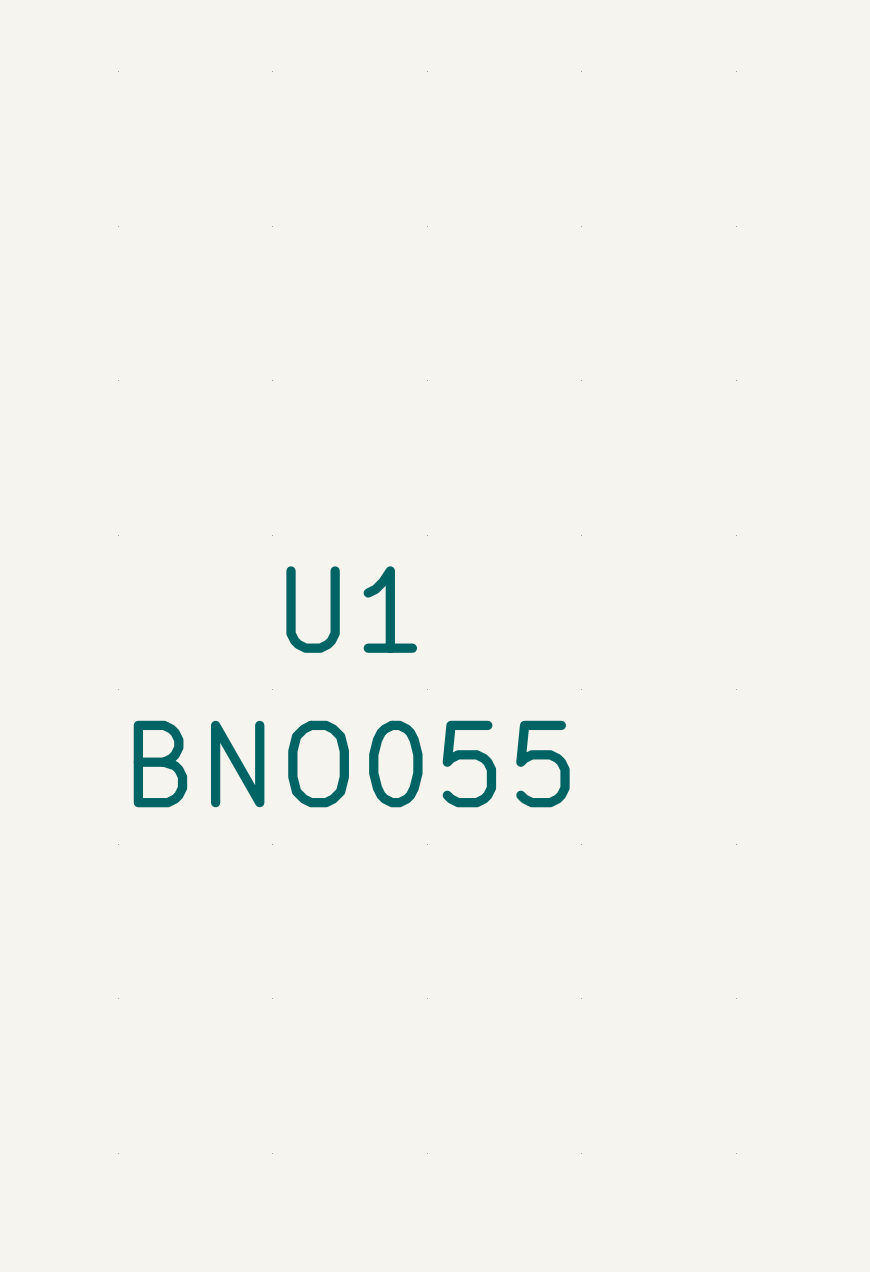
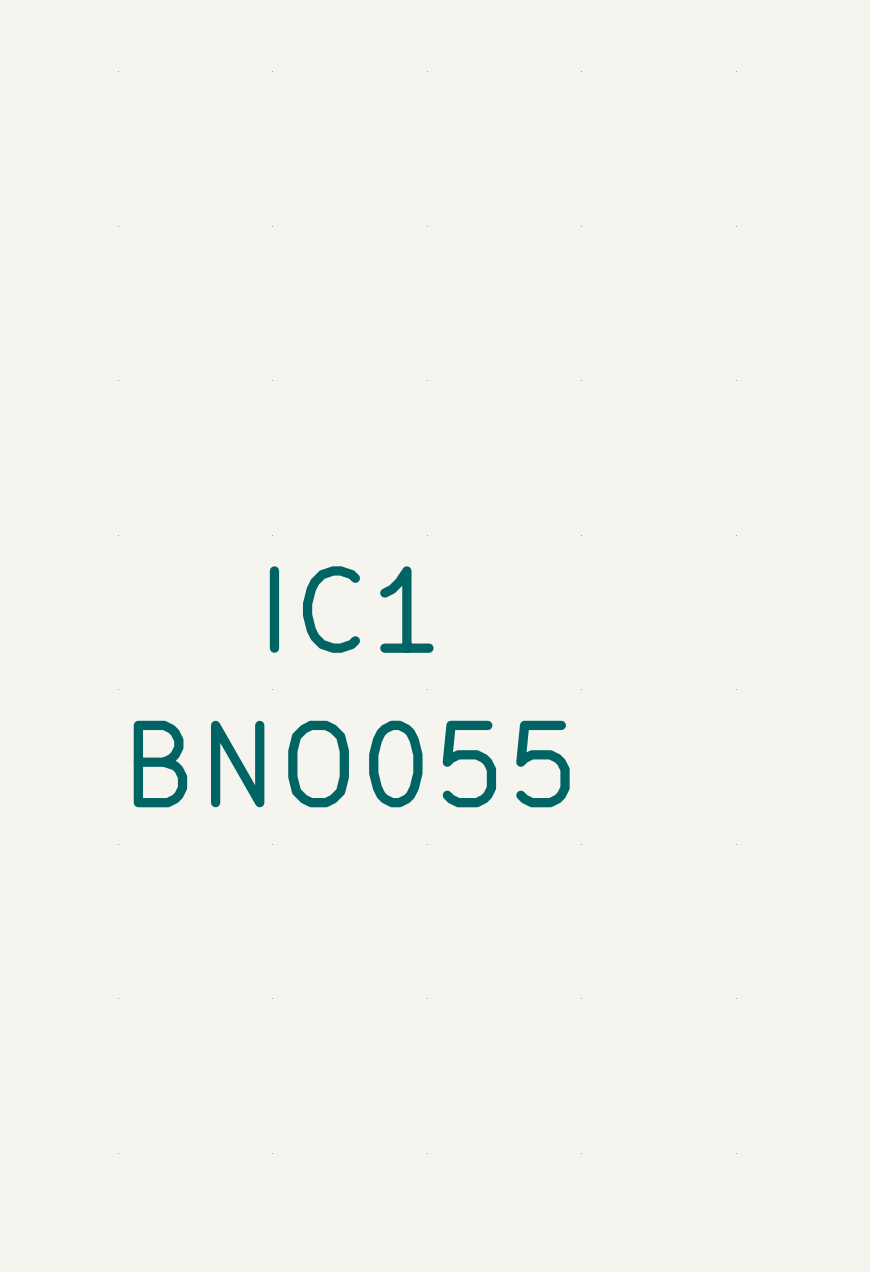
U1 name: U1 (351, 609) -> IC1 (351, 609)

